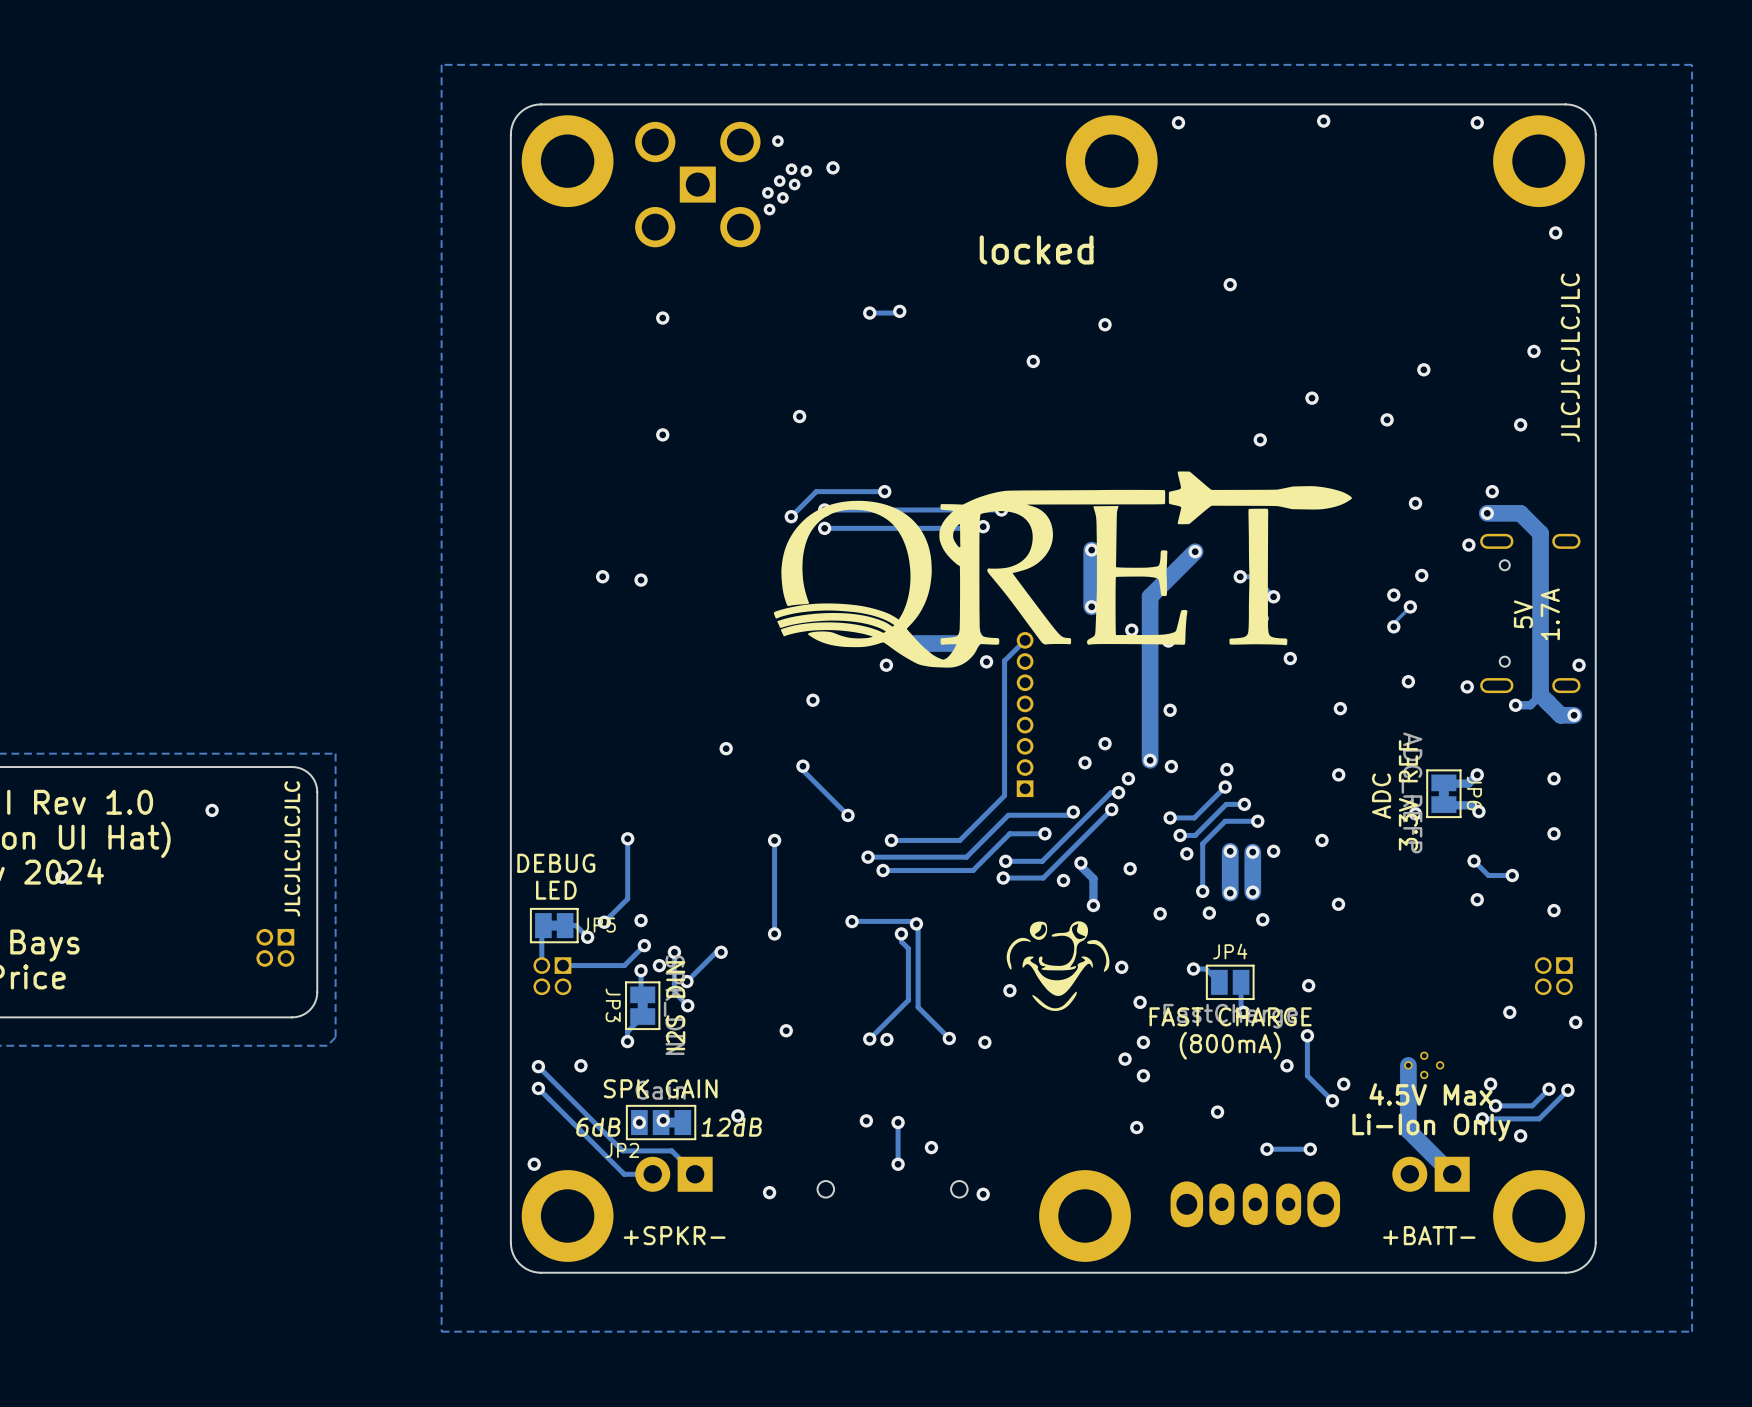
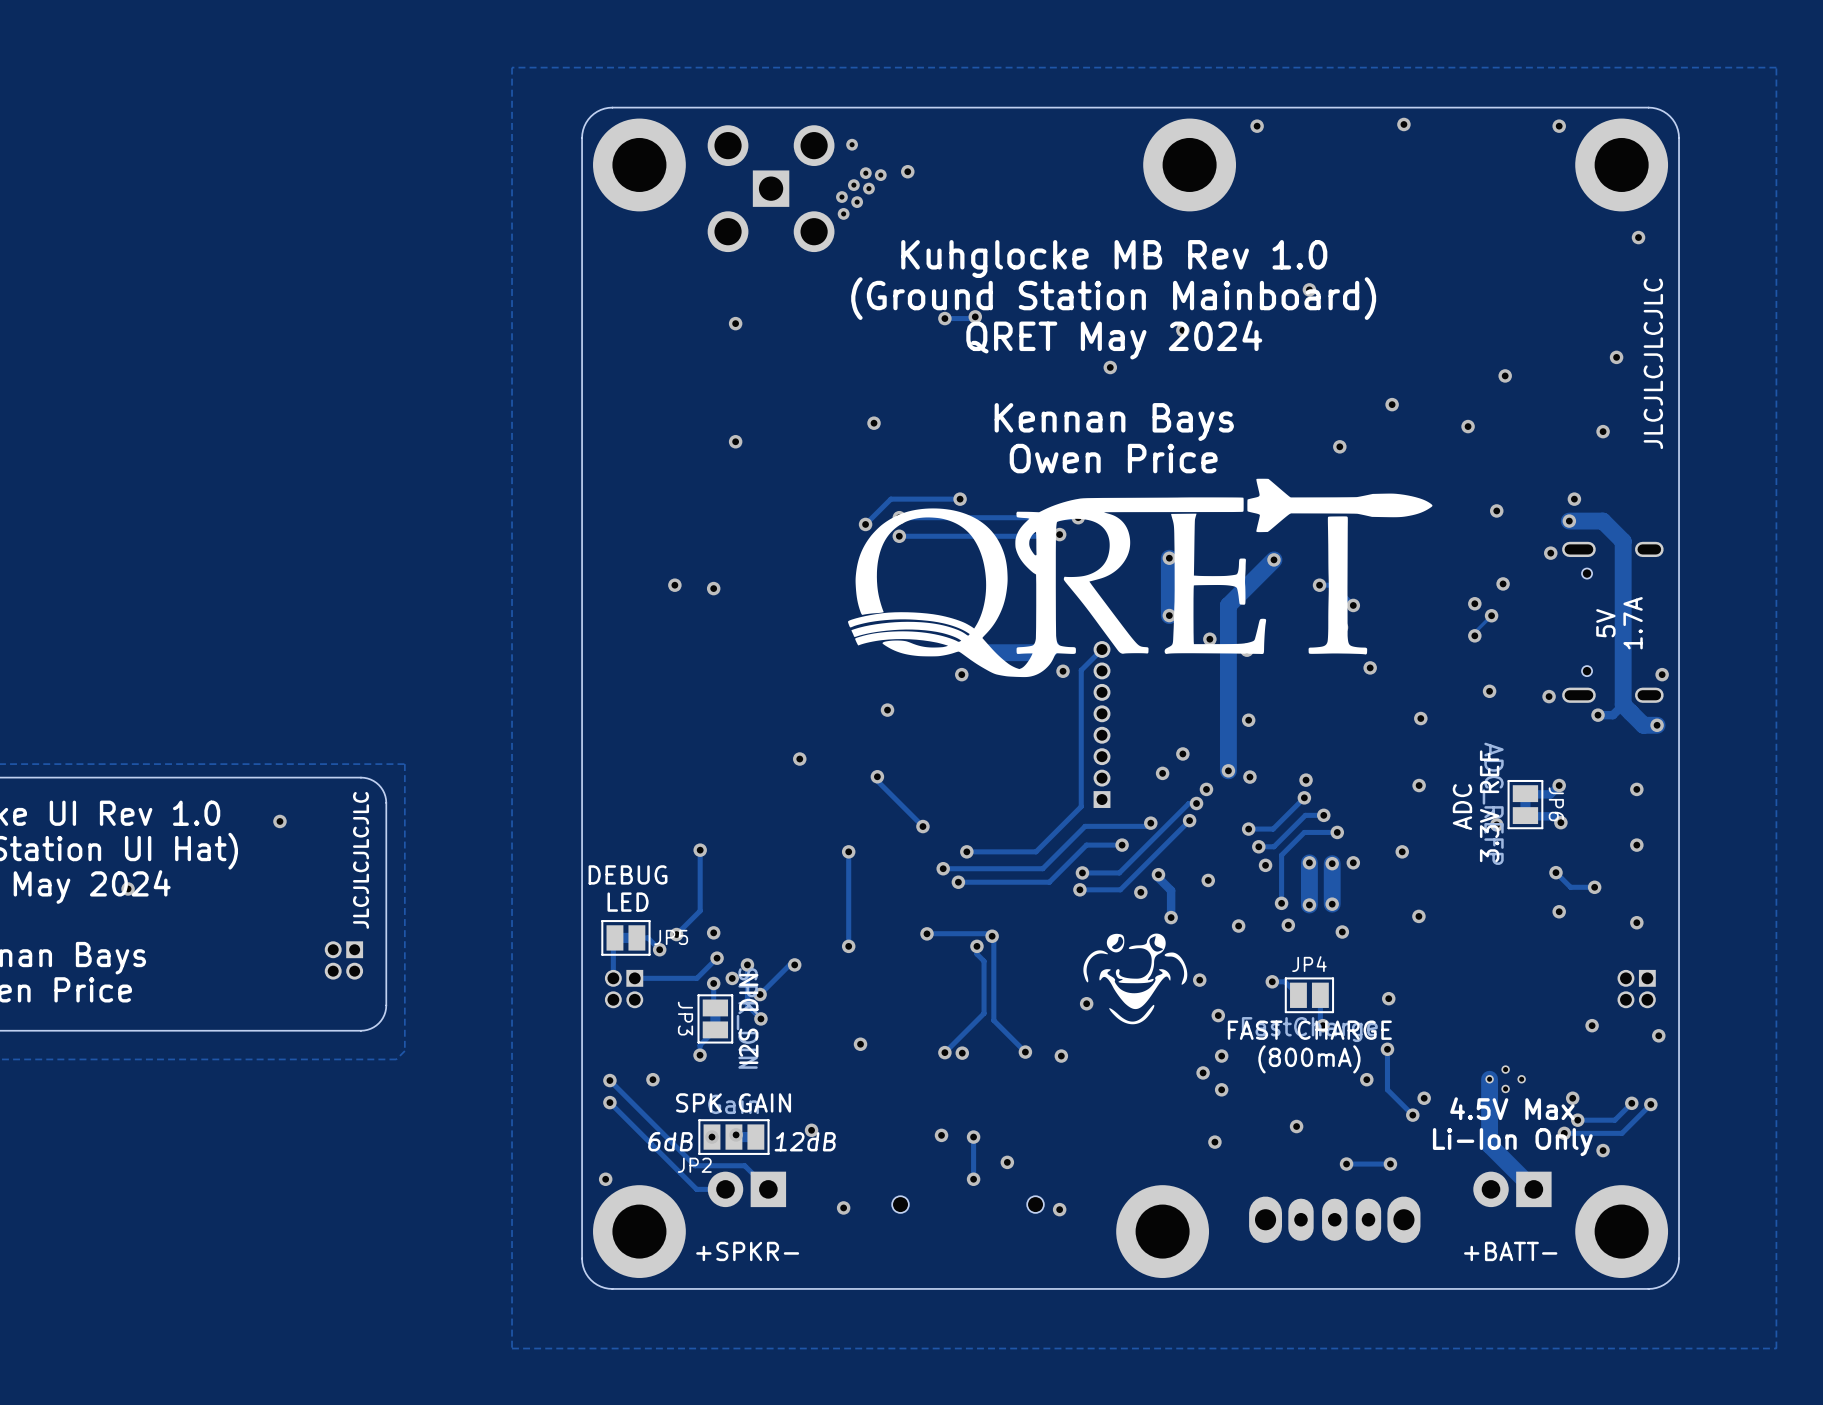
text: locked (1036, 249) -> Kuhglocke MB Rev 1.0 (1114, 259)
text: none -> (Ground Station Mainboard) (1113, 298)
text: none -> QRET May 2024 (1114, 339)
text: none -> Kennan Bays (1114, 422)
text: none -> Owen Price (1113, 458)

